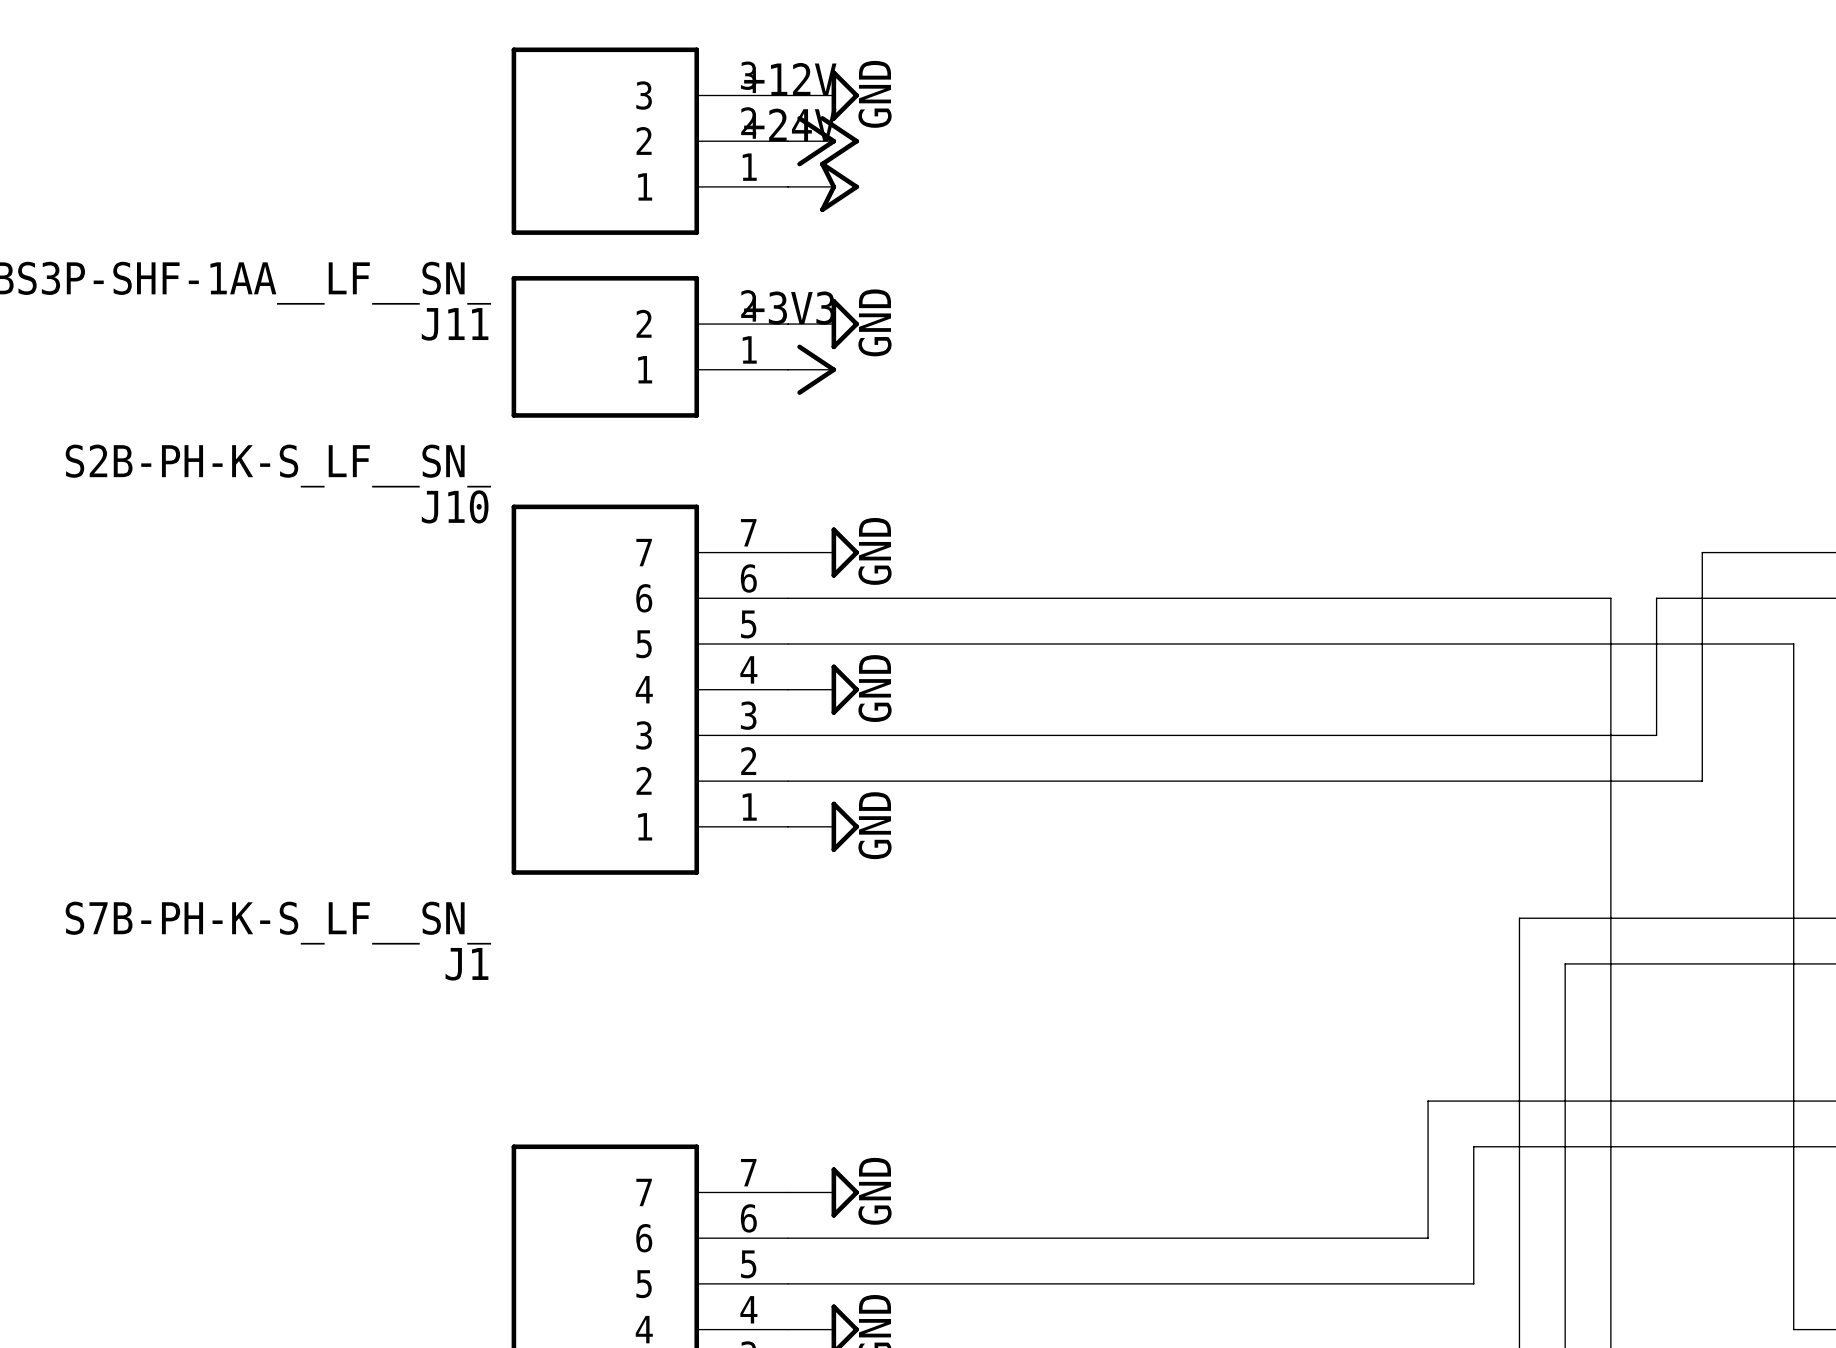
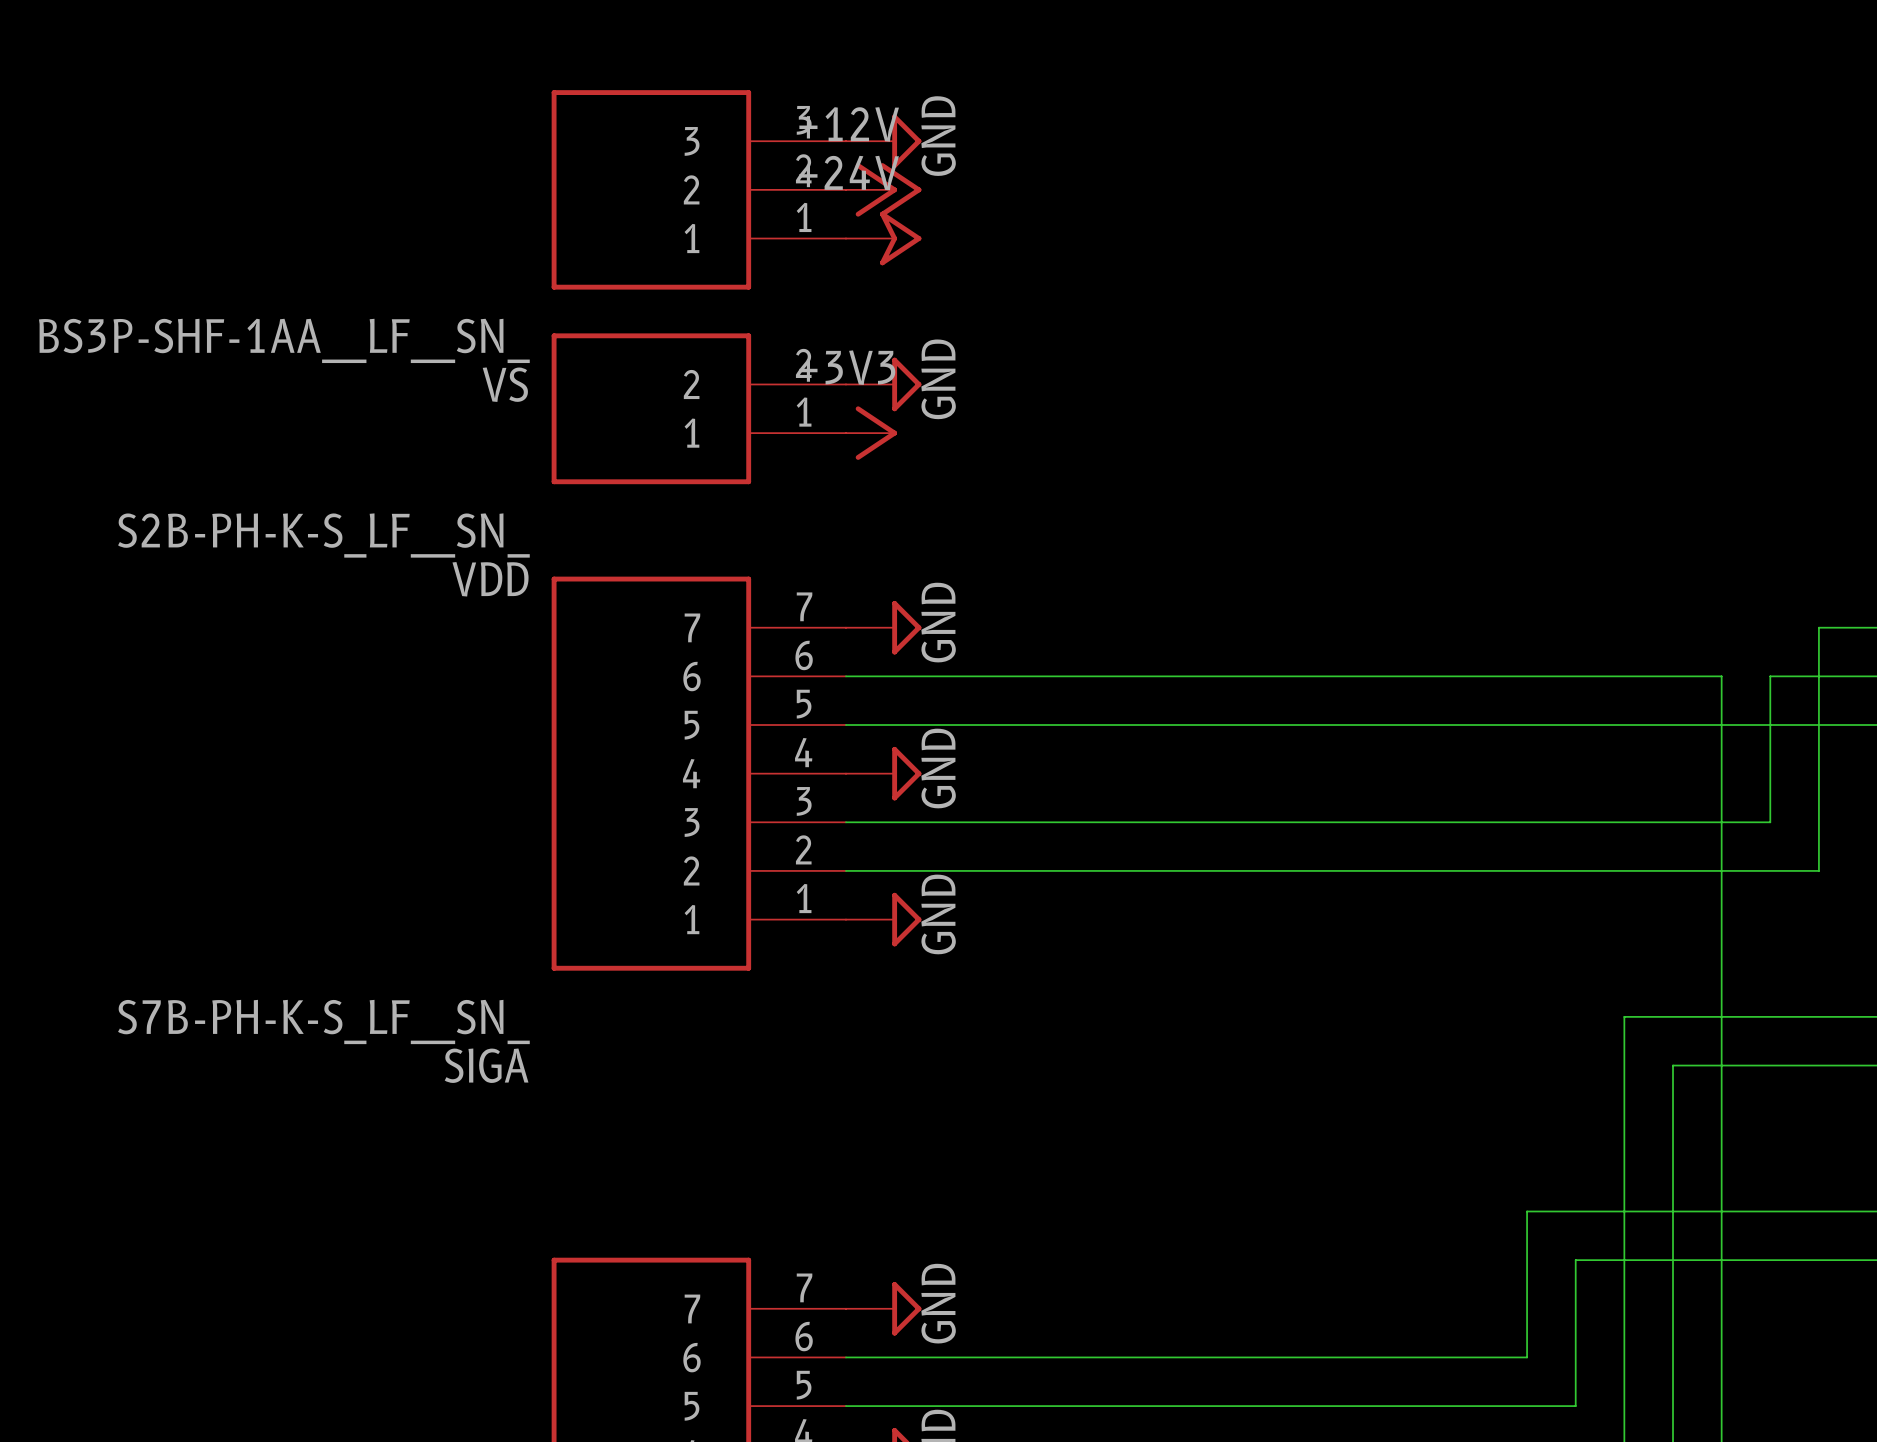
J11 name: J11 (455, 324) -> VS (505, 384)
J10 name: J10 (455, 506) -> VDD (490, 579)
J1 name: J1 (466, 964) -> SIGA (486, 1065)

